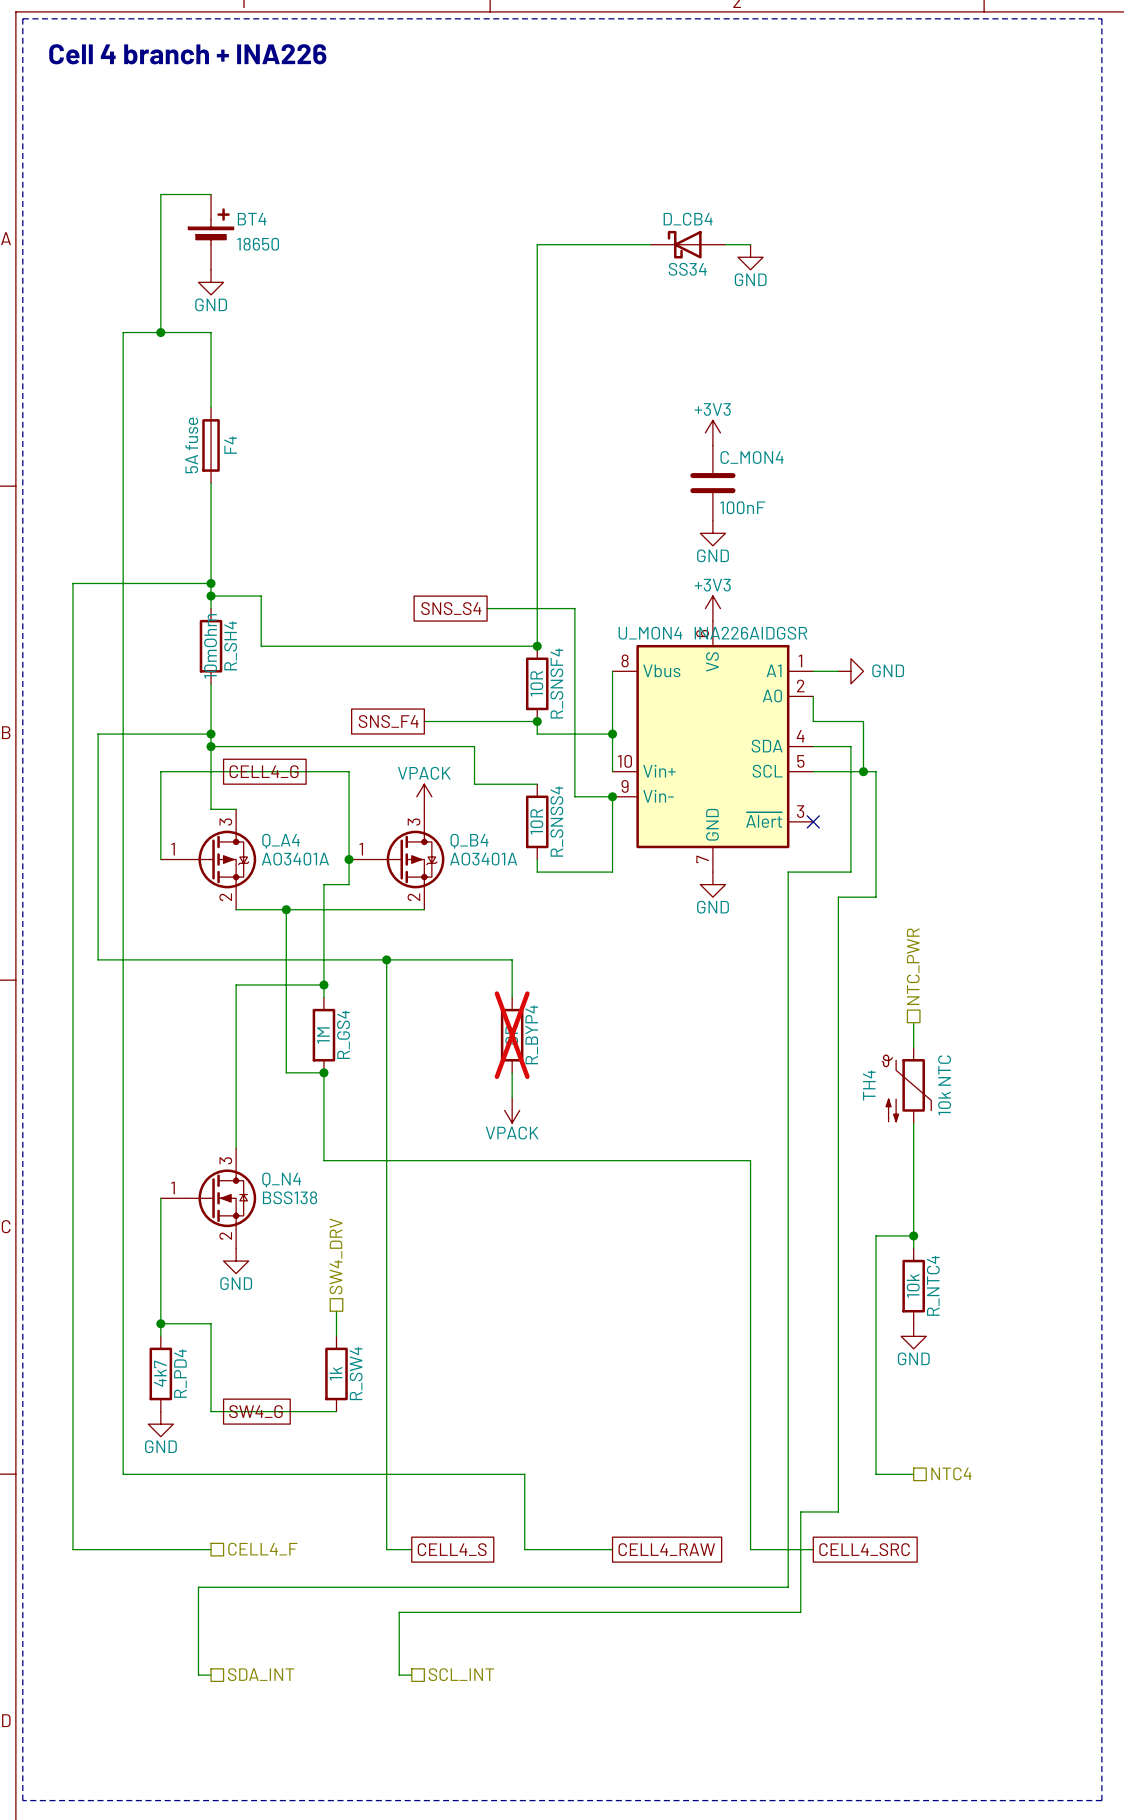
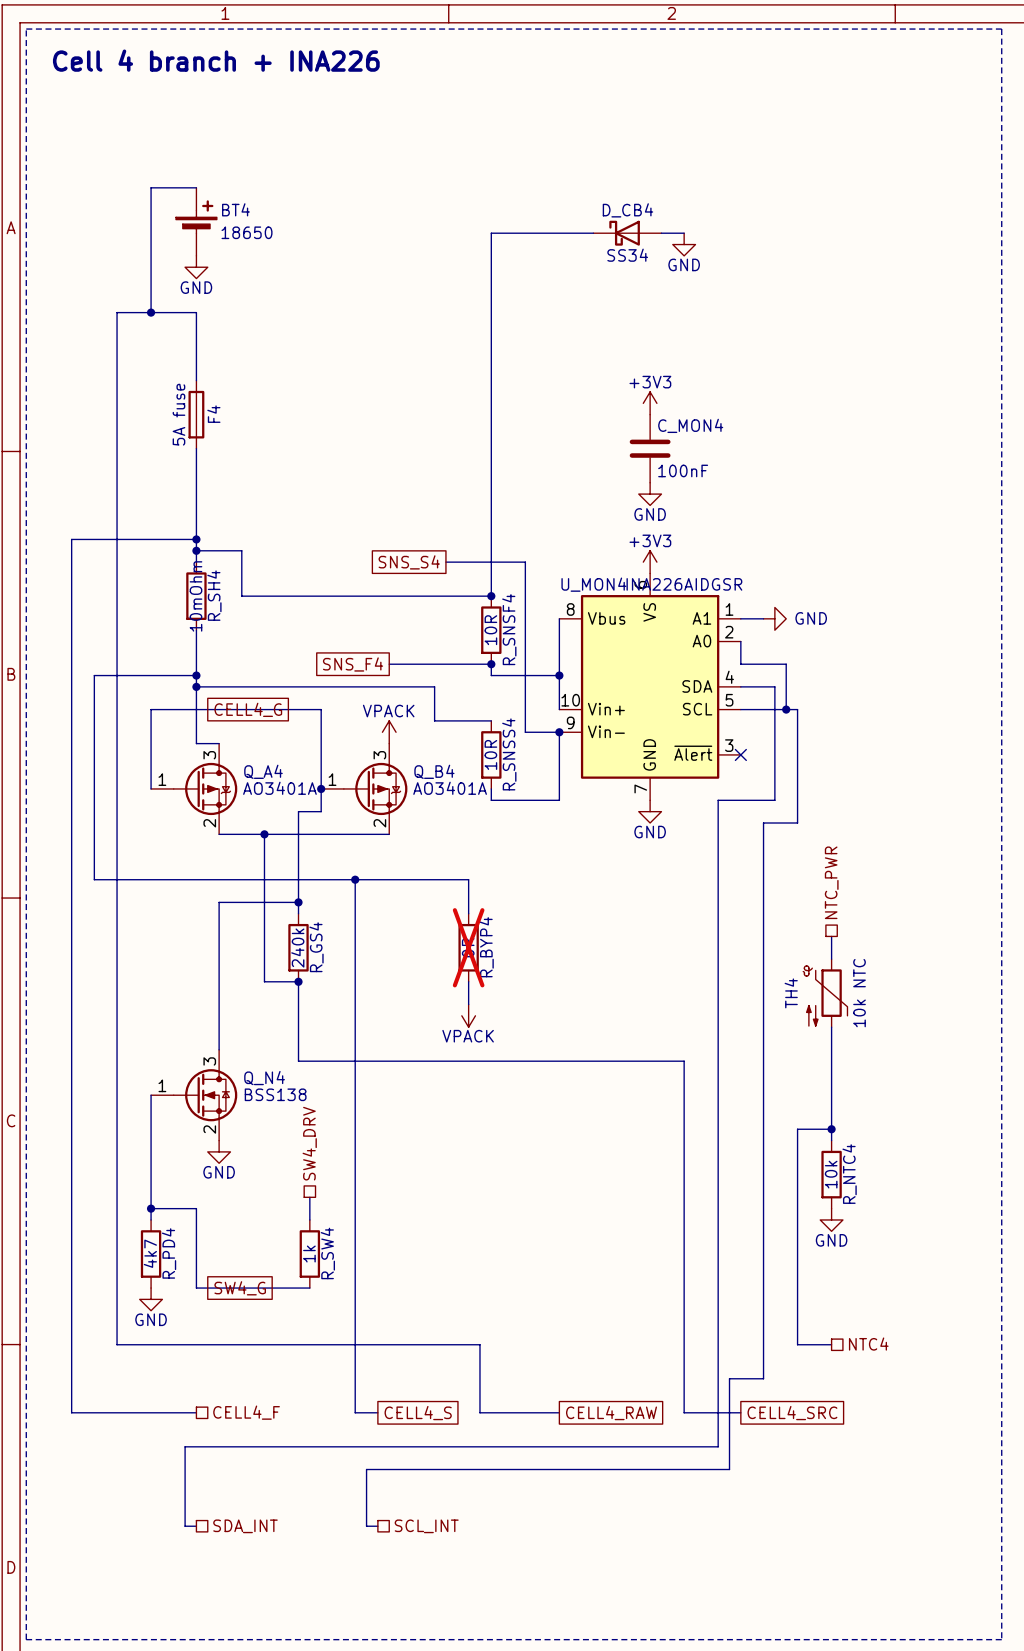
R_GS4 value: 1M (323, 1035) -> 240k (297, 948)

